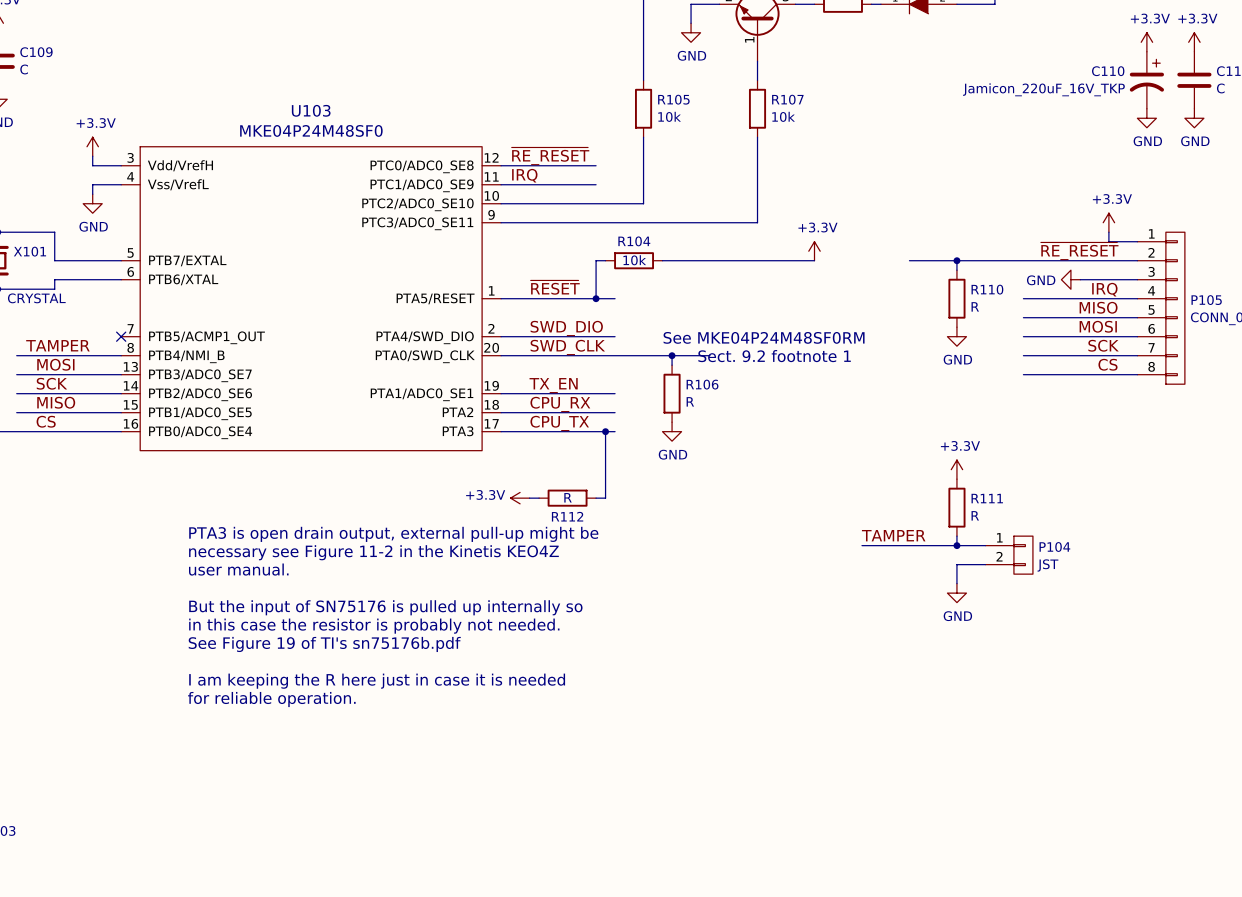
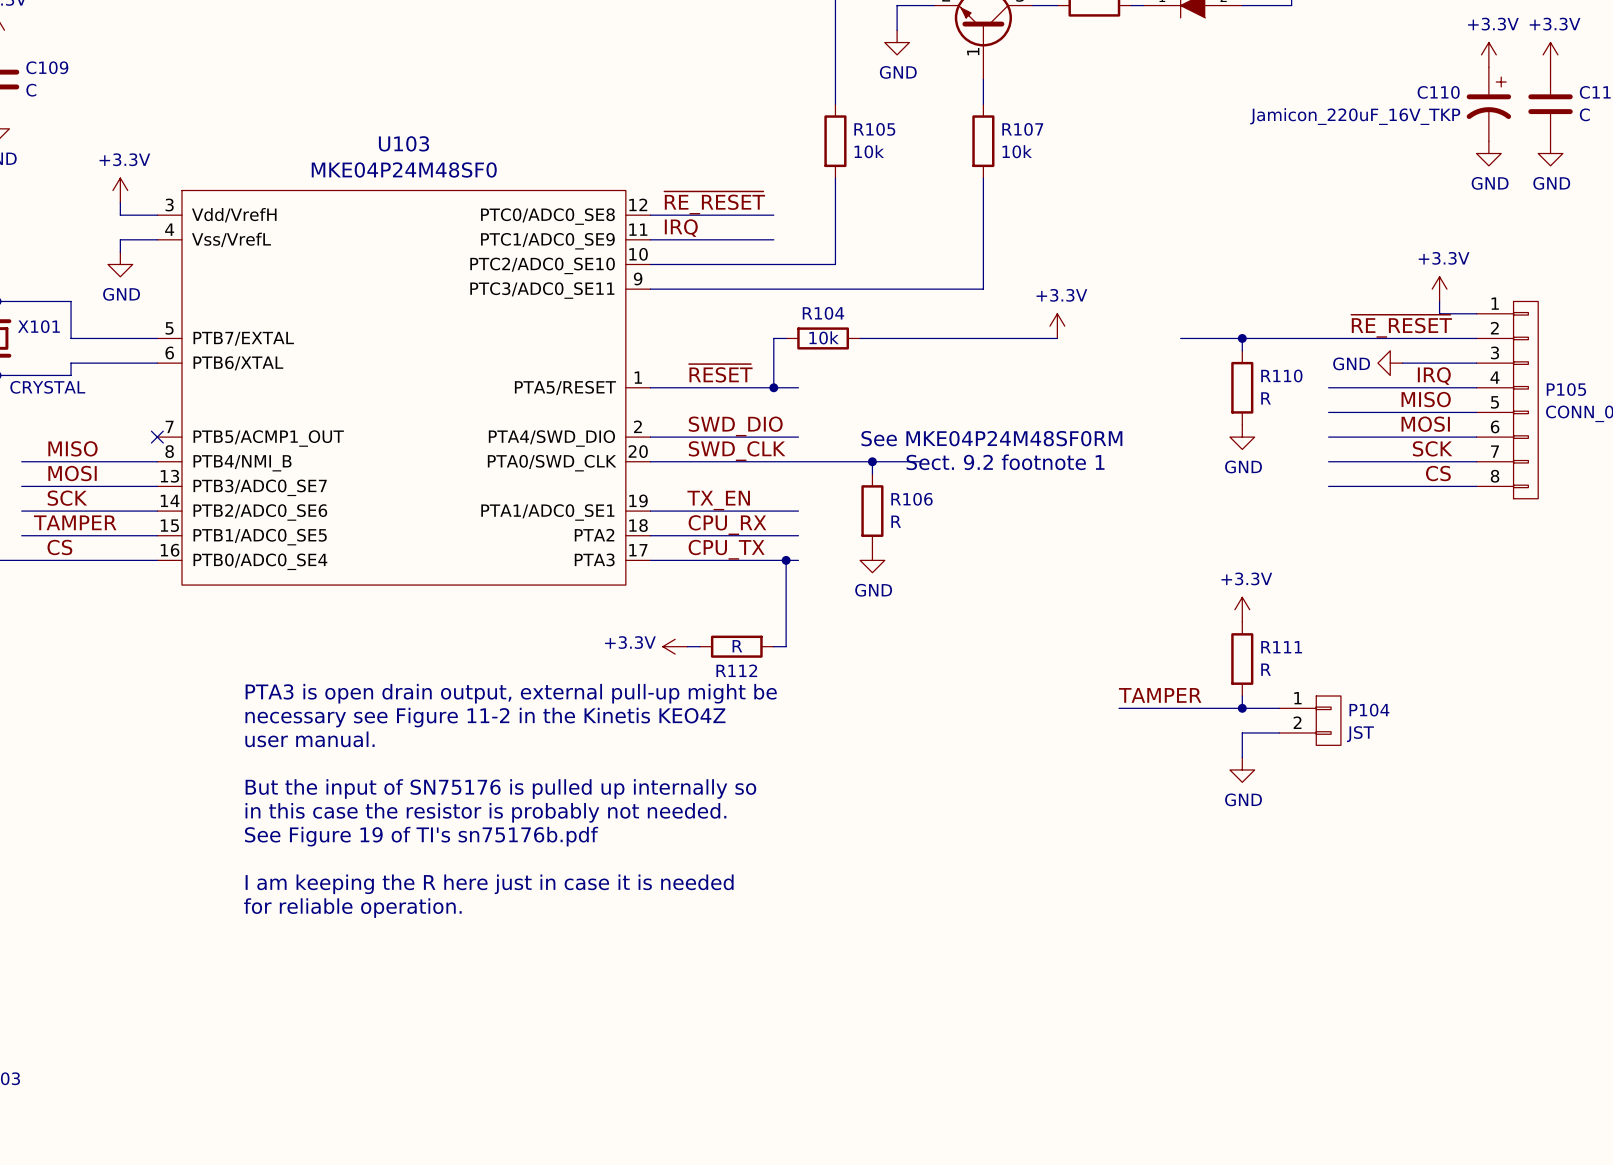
label position: TAMPER (57, 345) -> TAMPER (75, 522)
label position: MISO (56, 402) -> MISO (72, 448)

